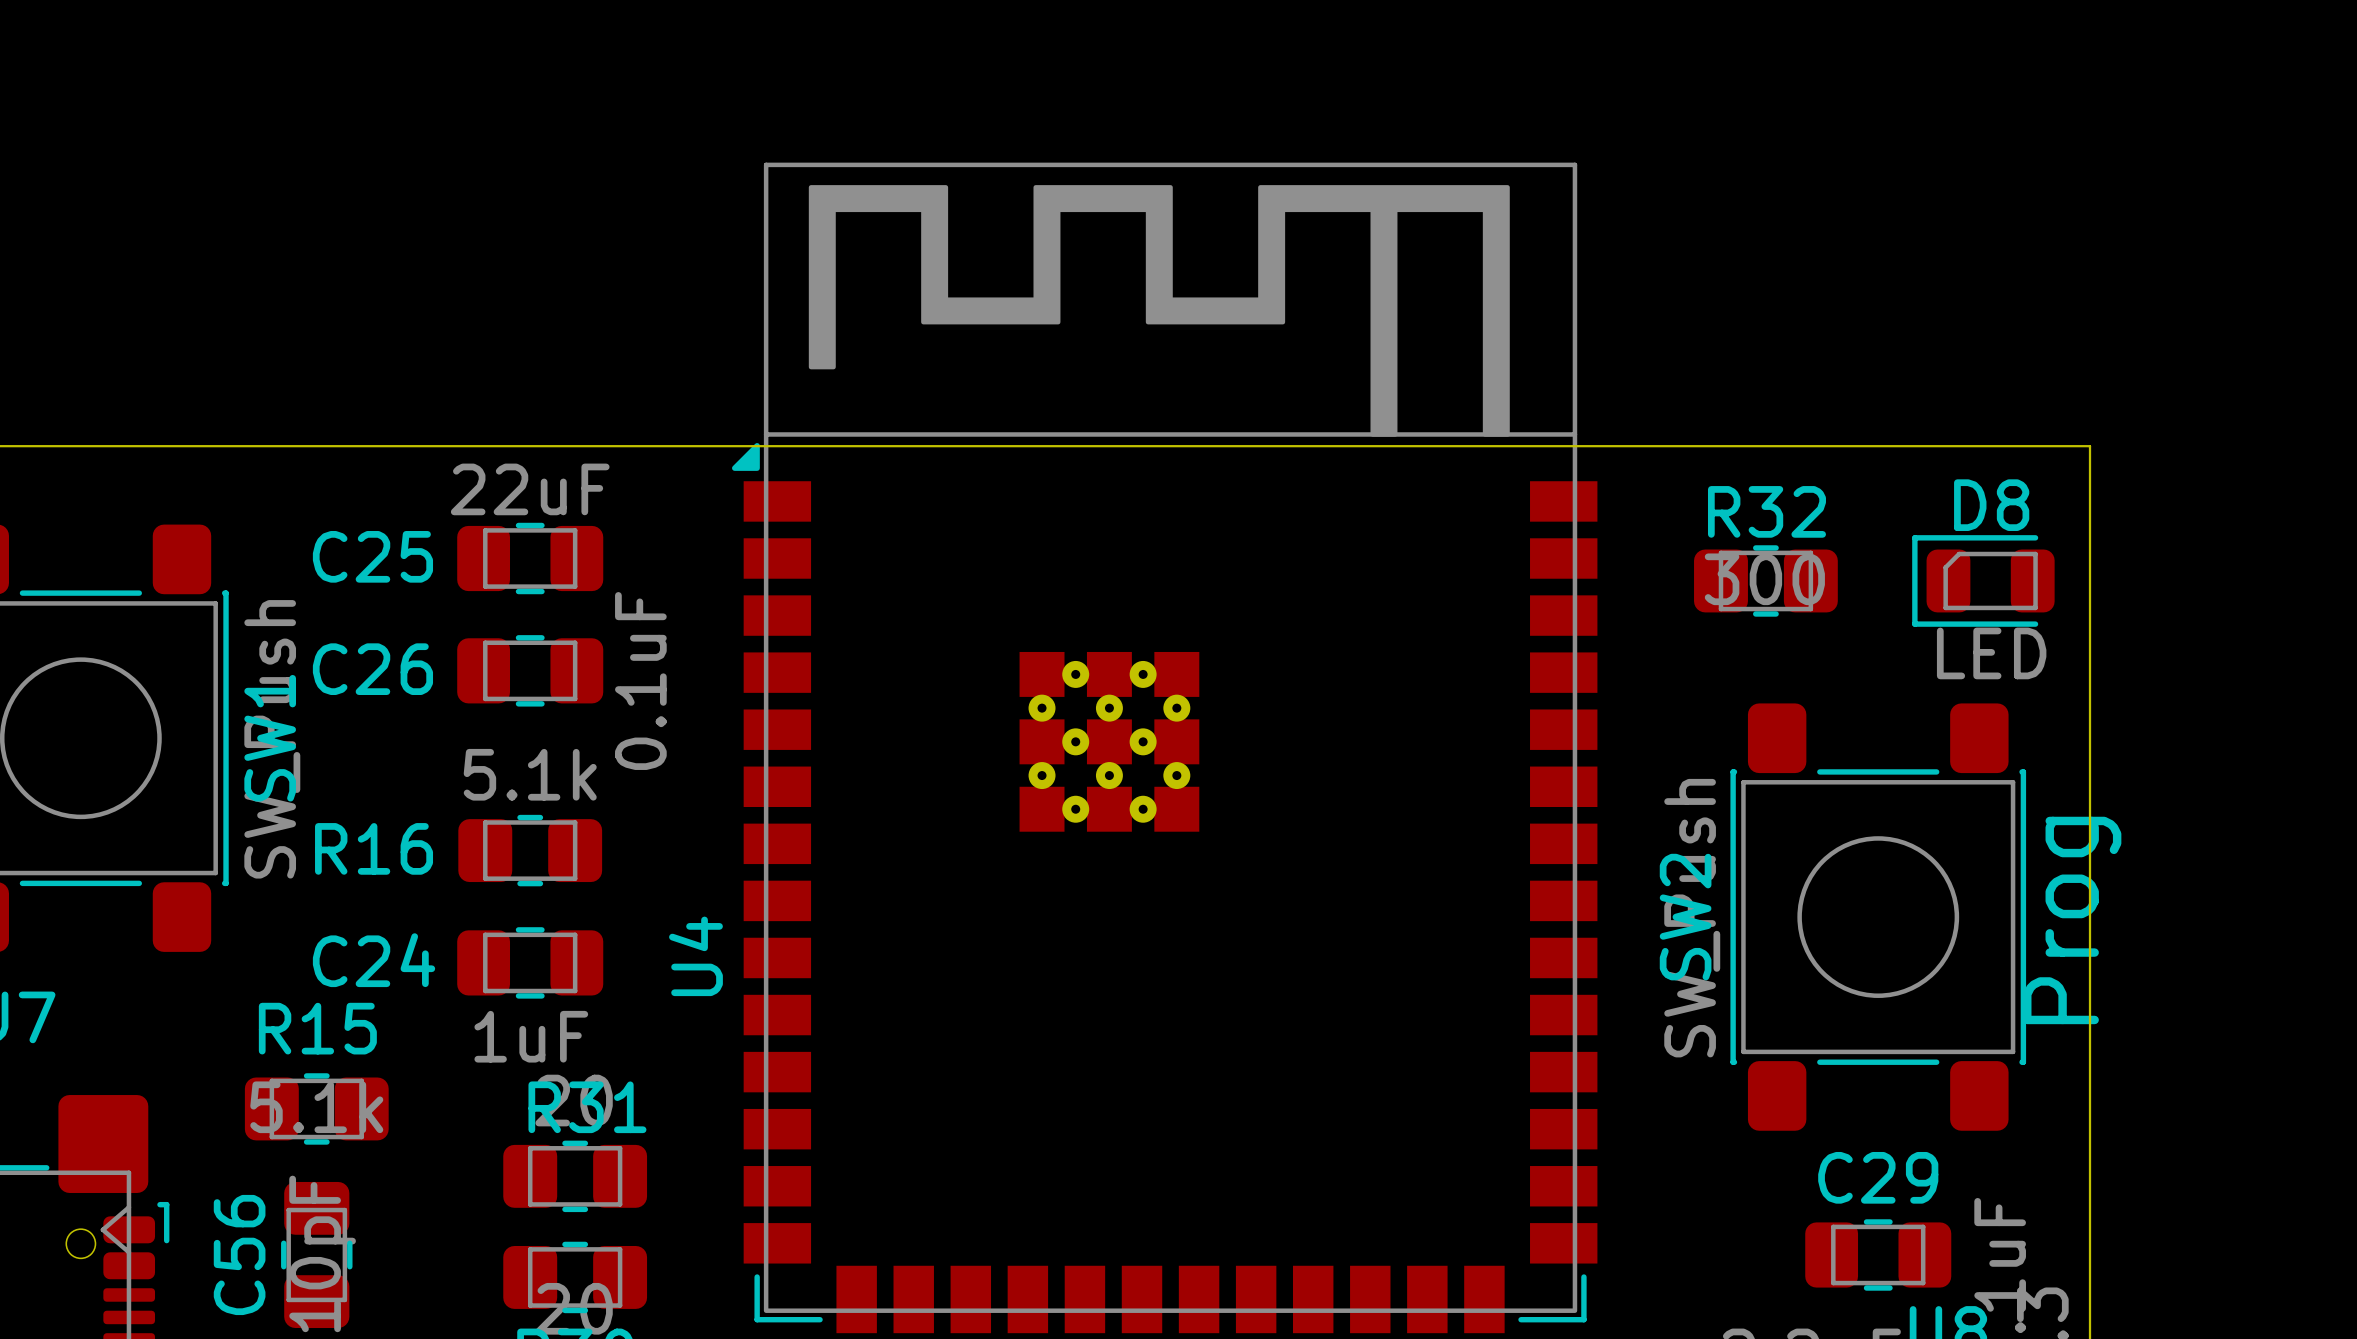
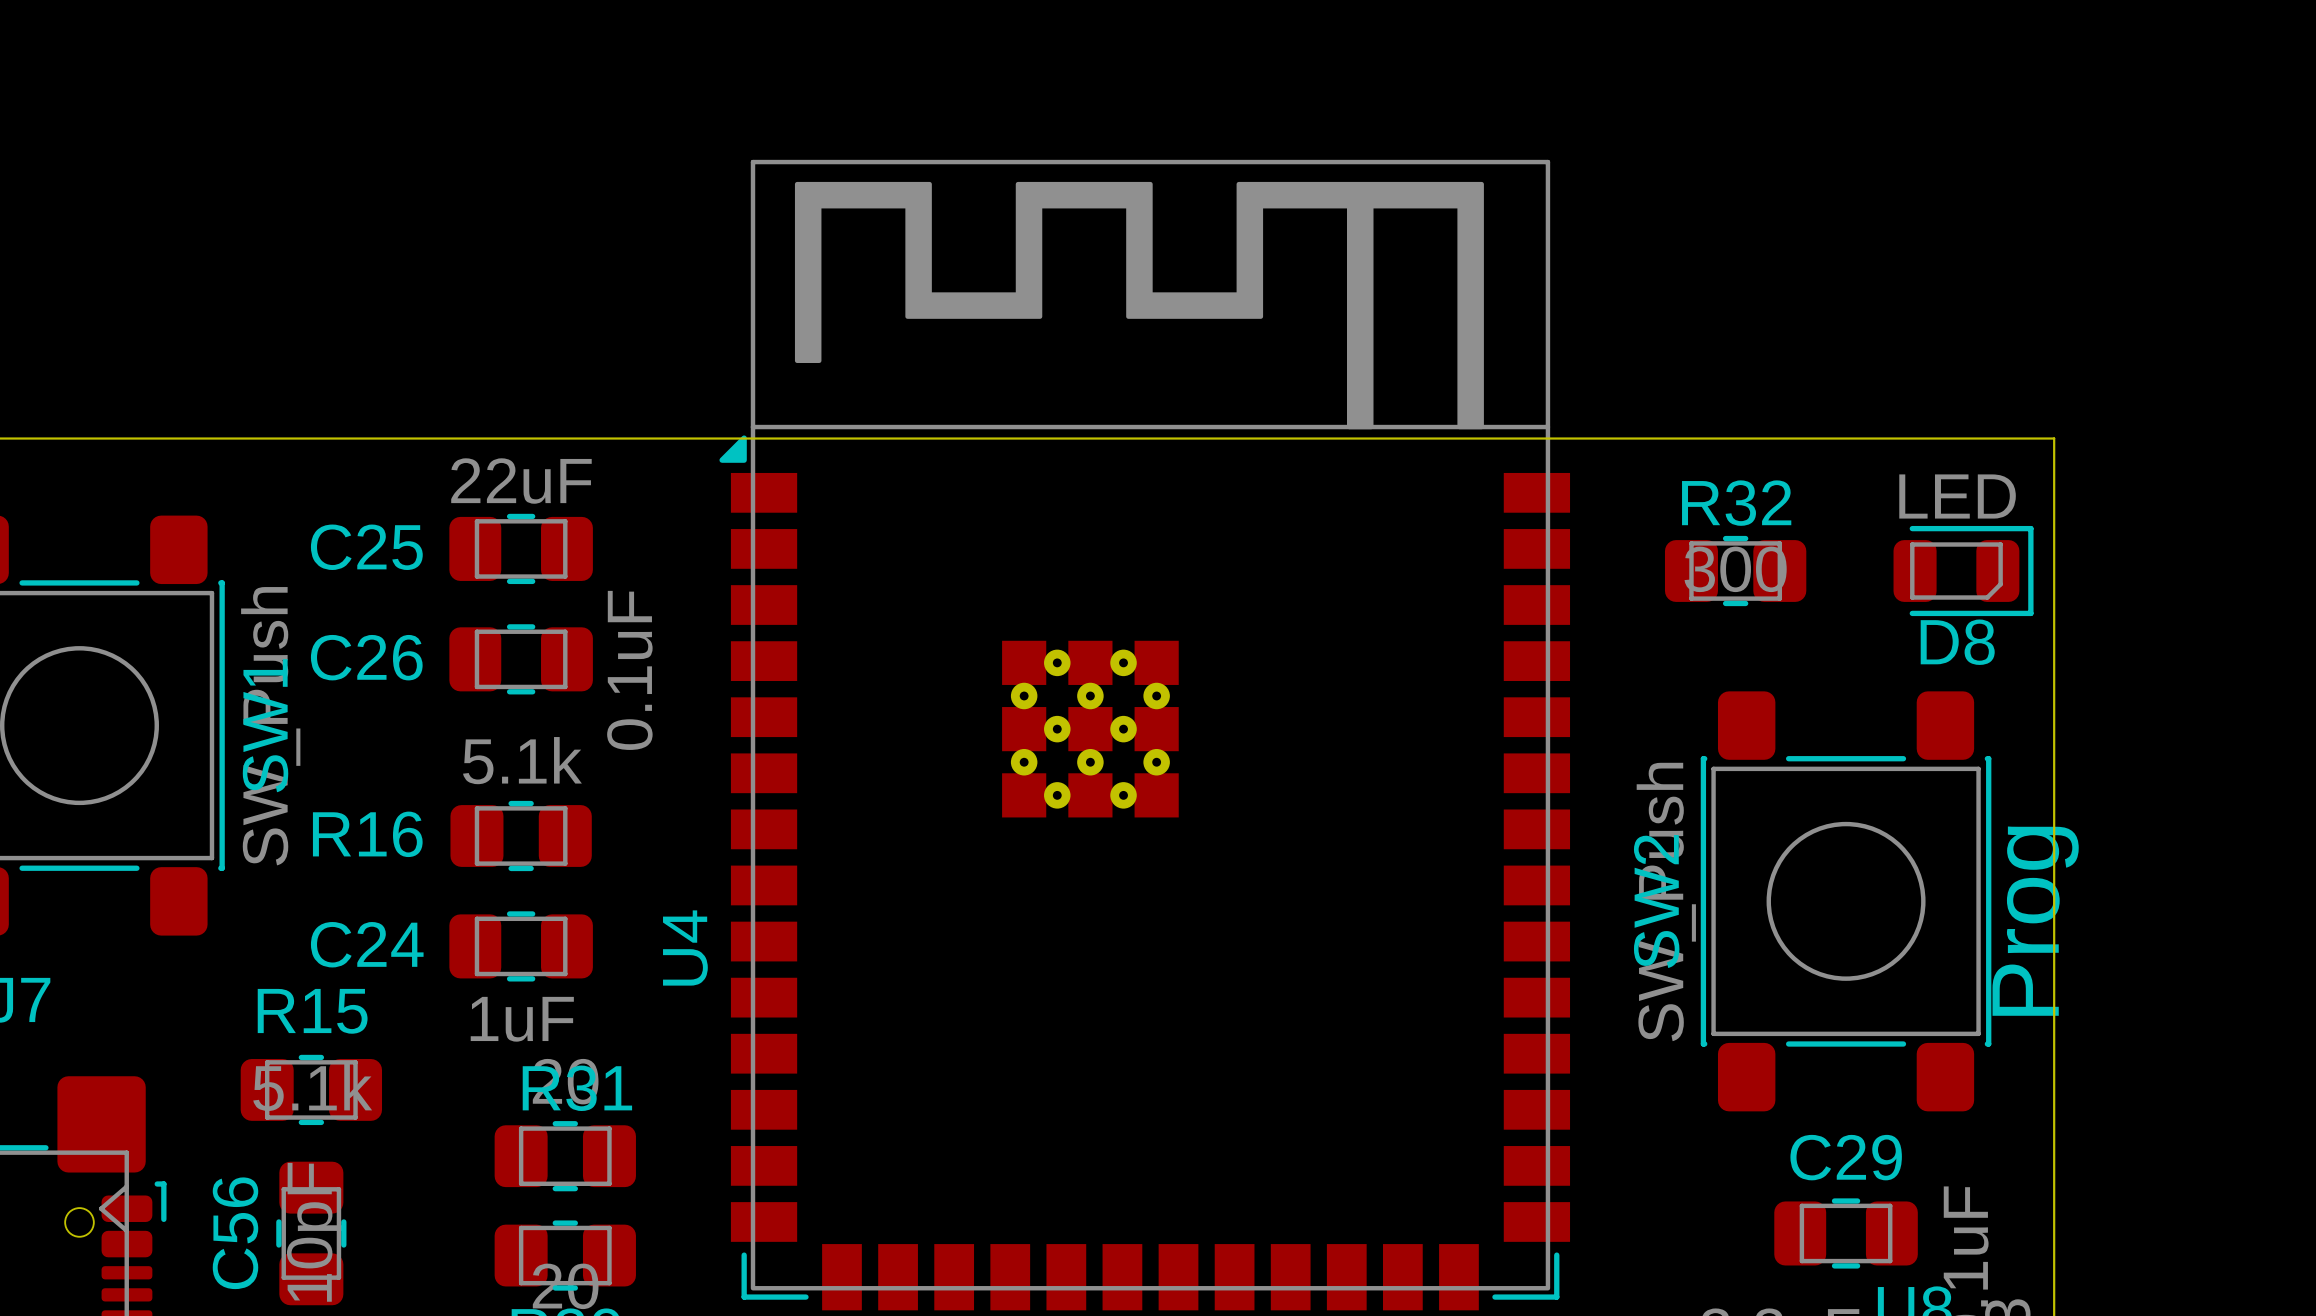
D8 rotation: 0° (1983, 580) -> 180° (1963, 571)

